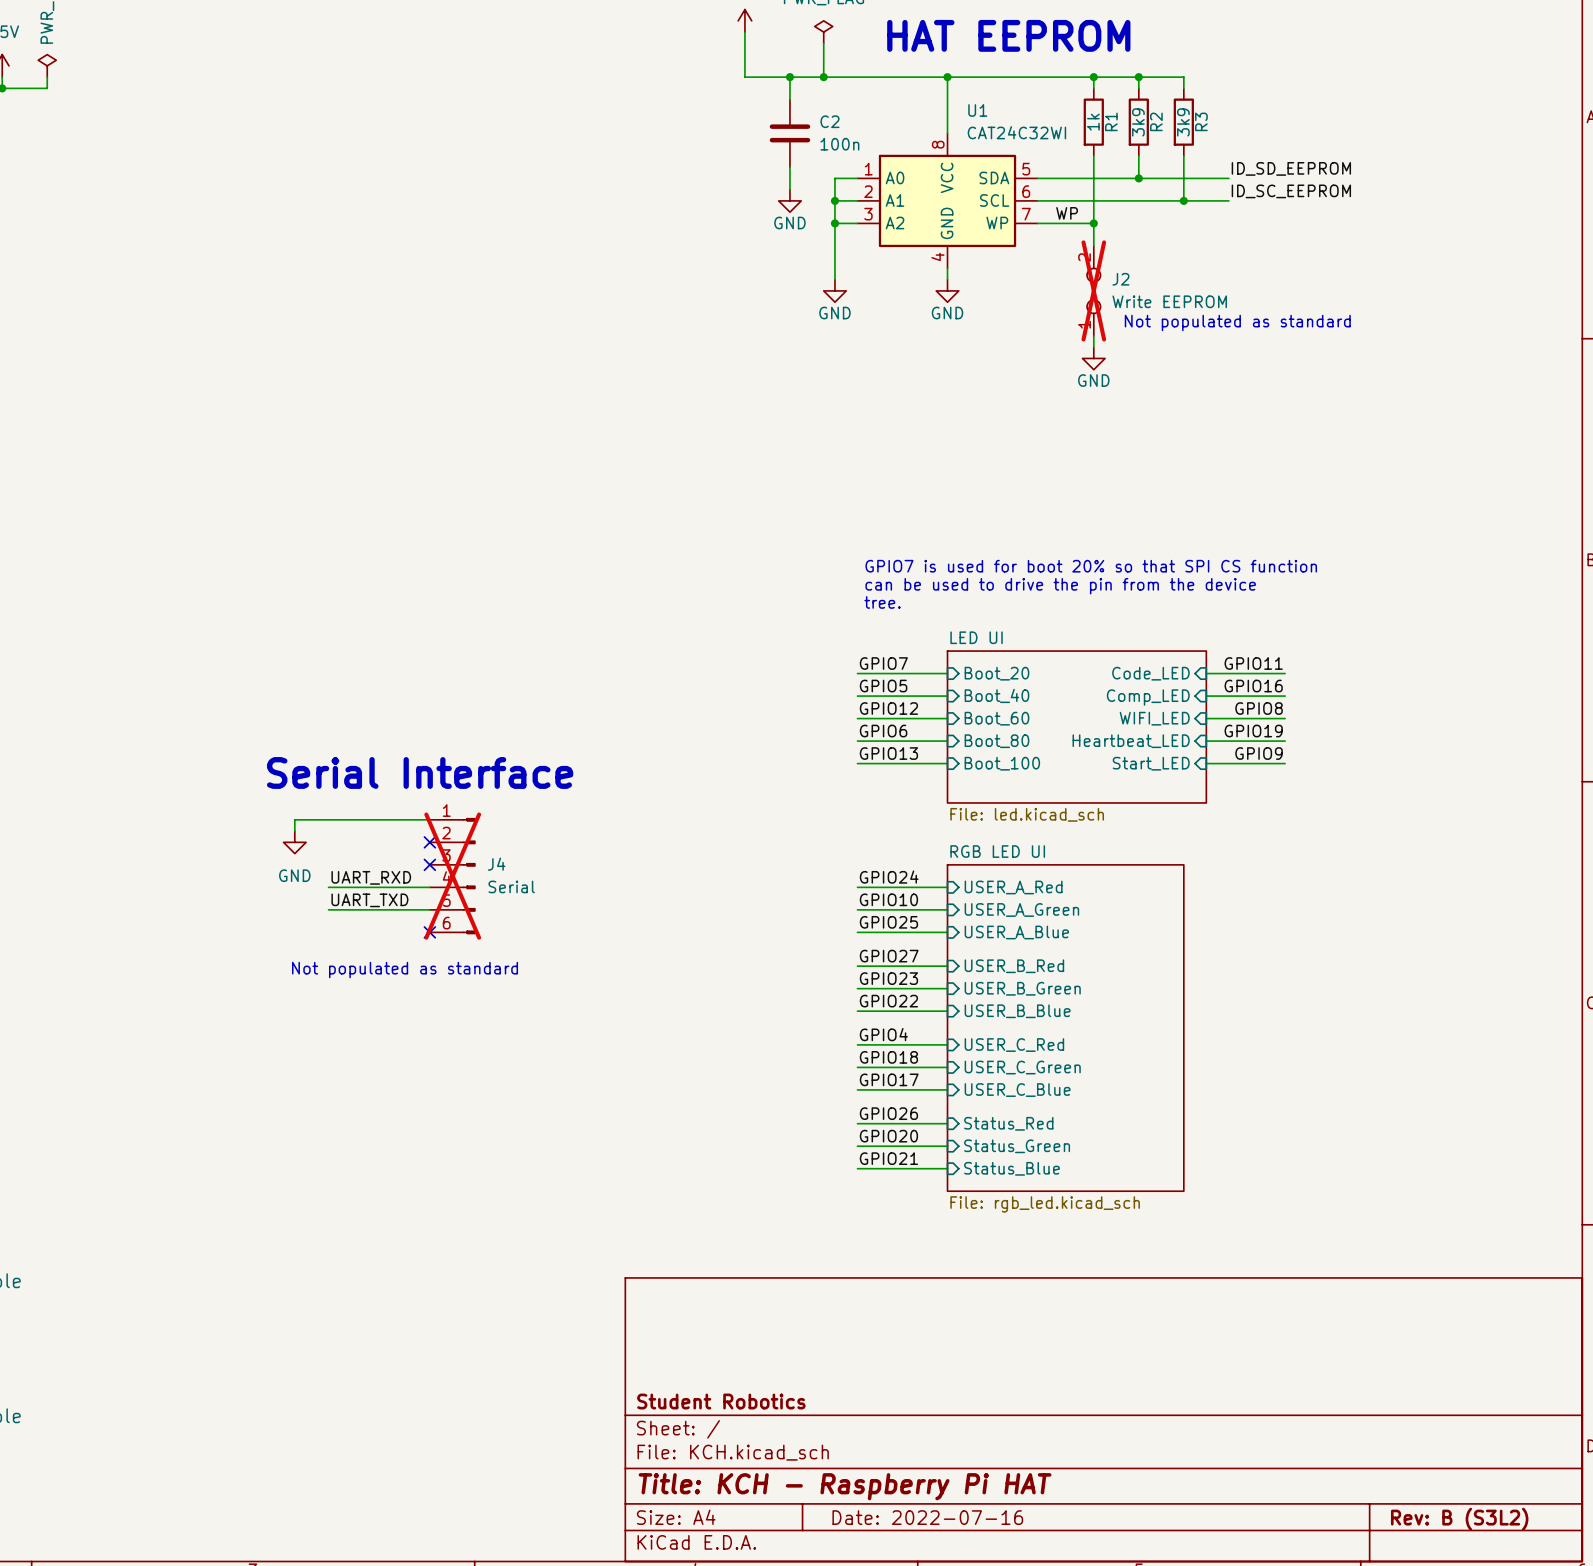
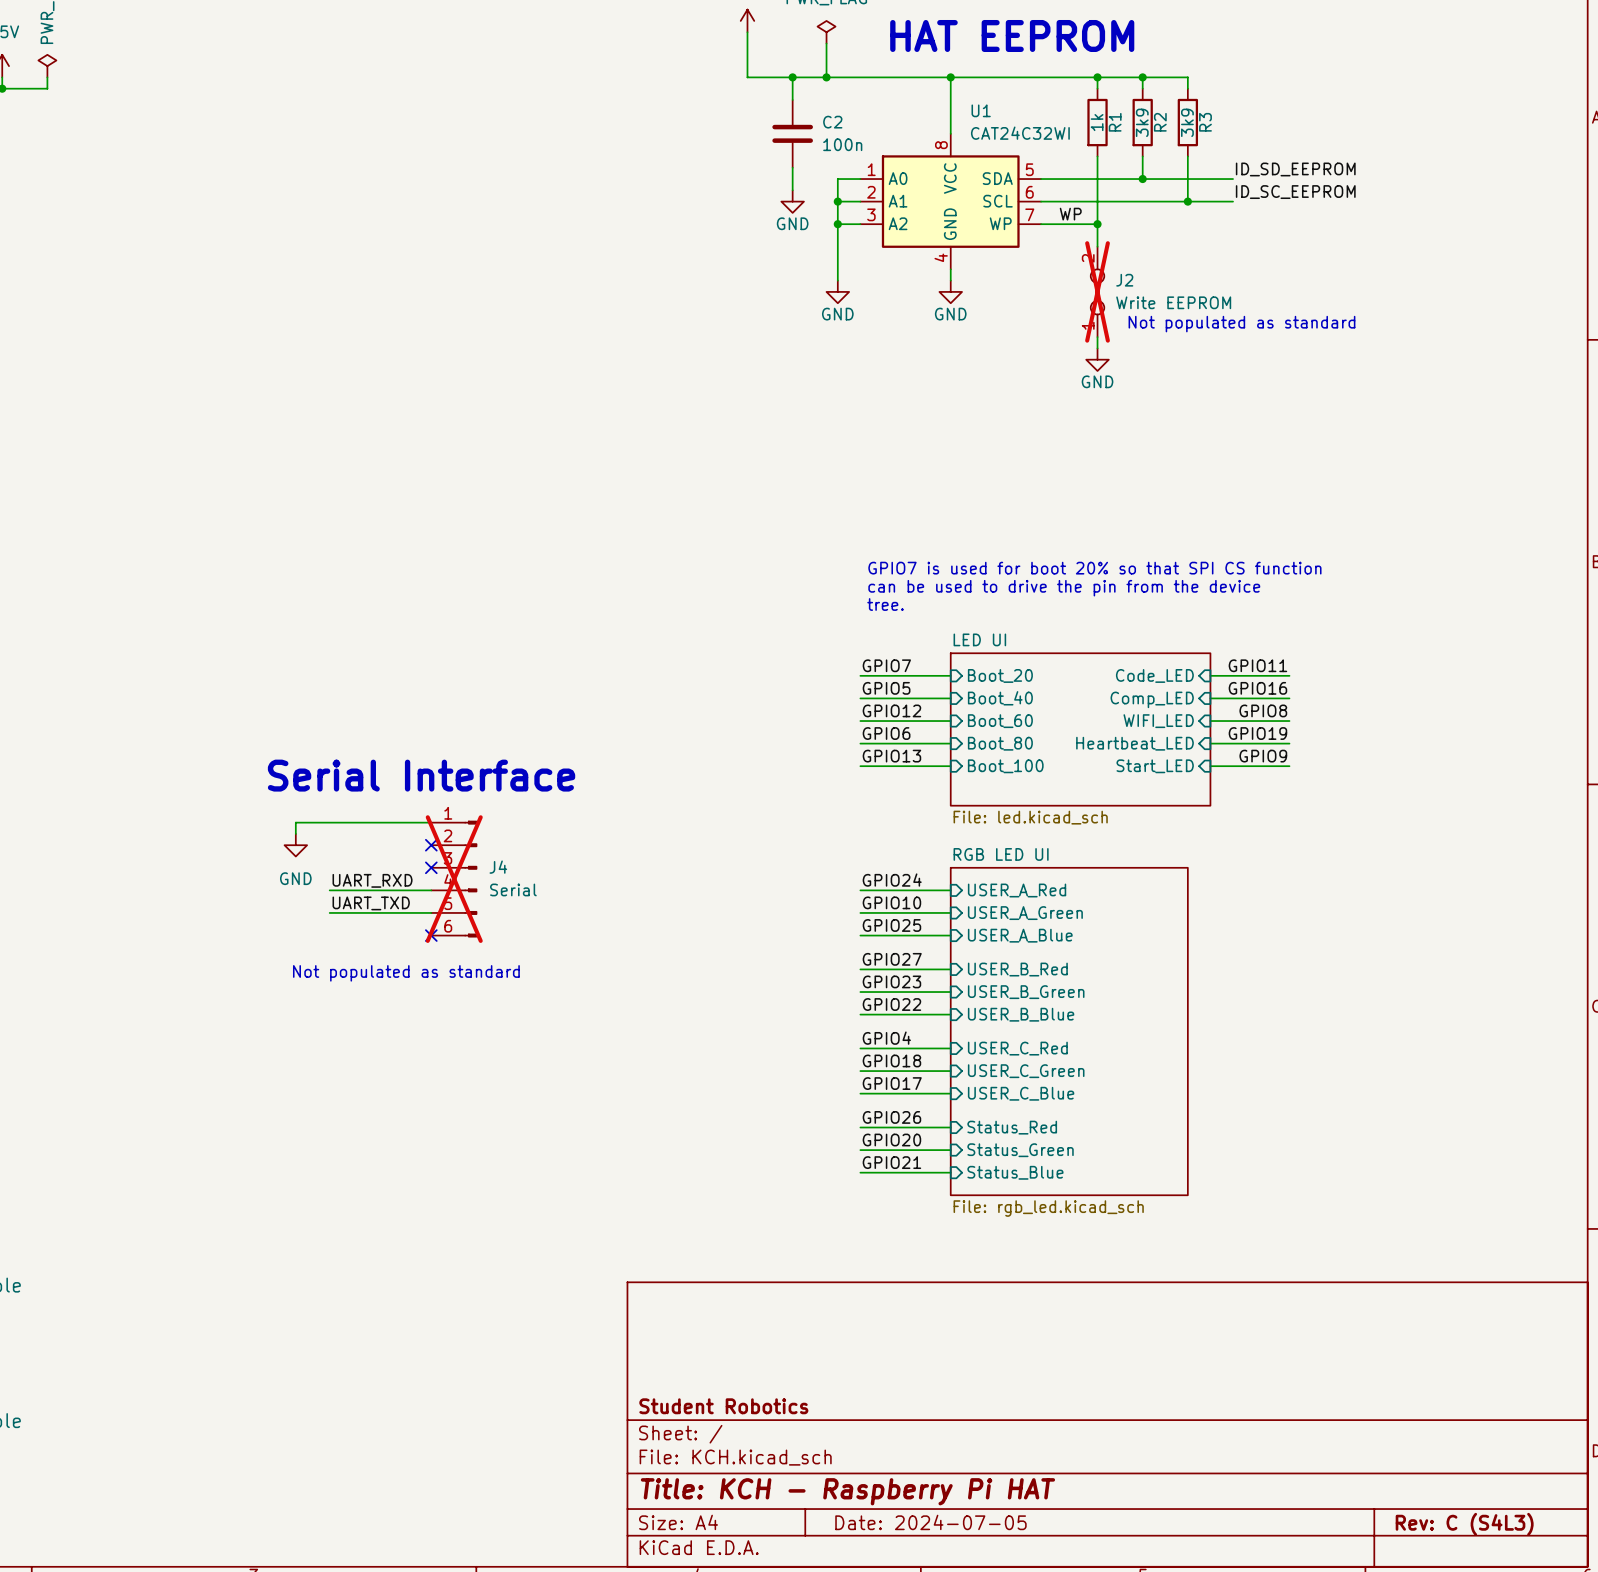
title block: Date: 2022-07-16 (927, 1517) -> Date: 2024-07-05 (930, 1522)
title block: Rev: B (S3L2) (1459, 1519) -> Rev: C (S4L3) (1464, 1524)

